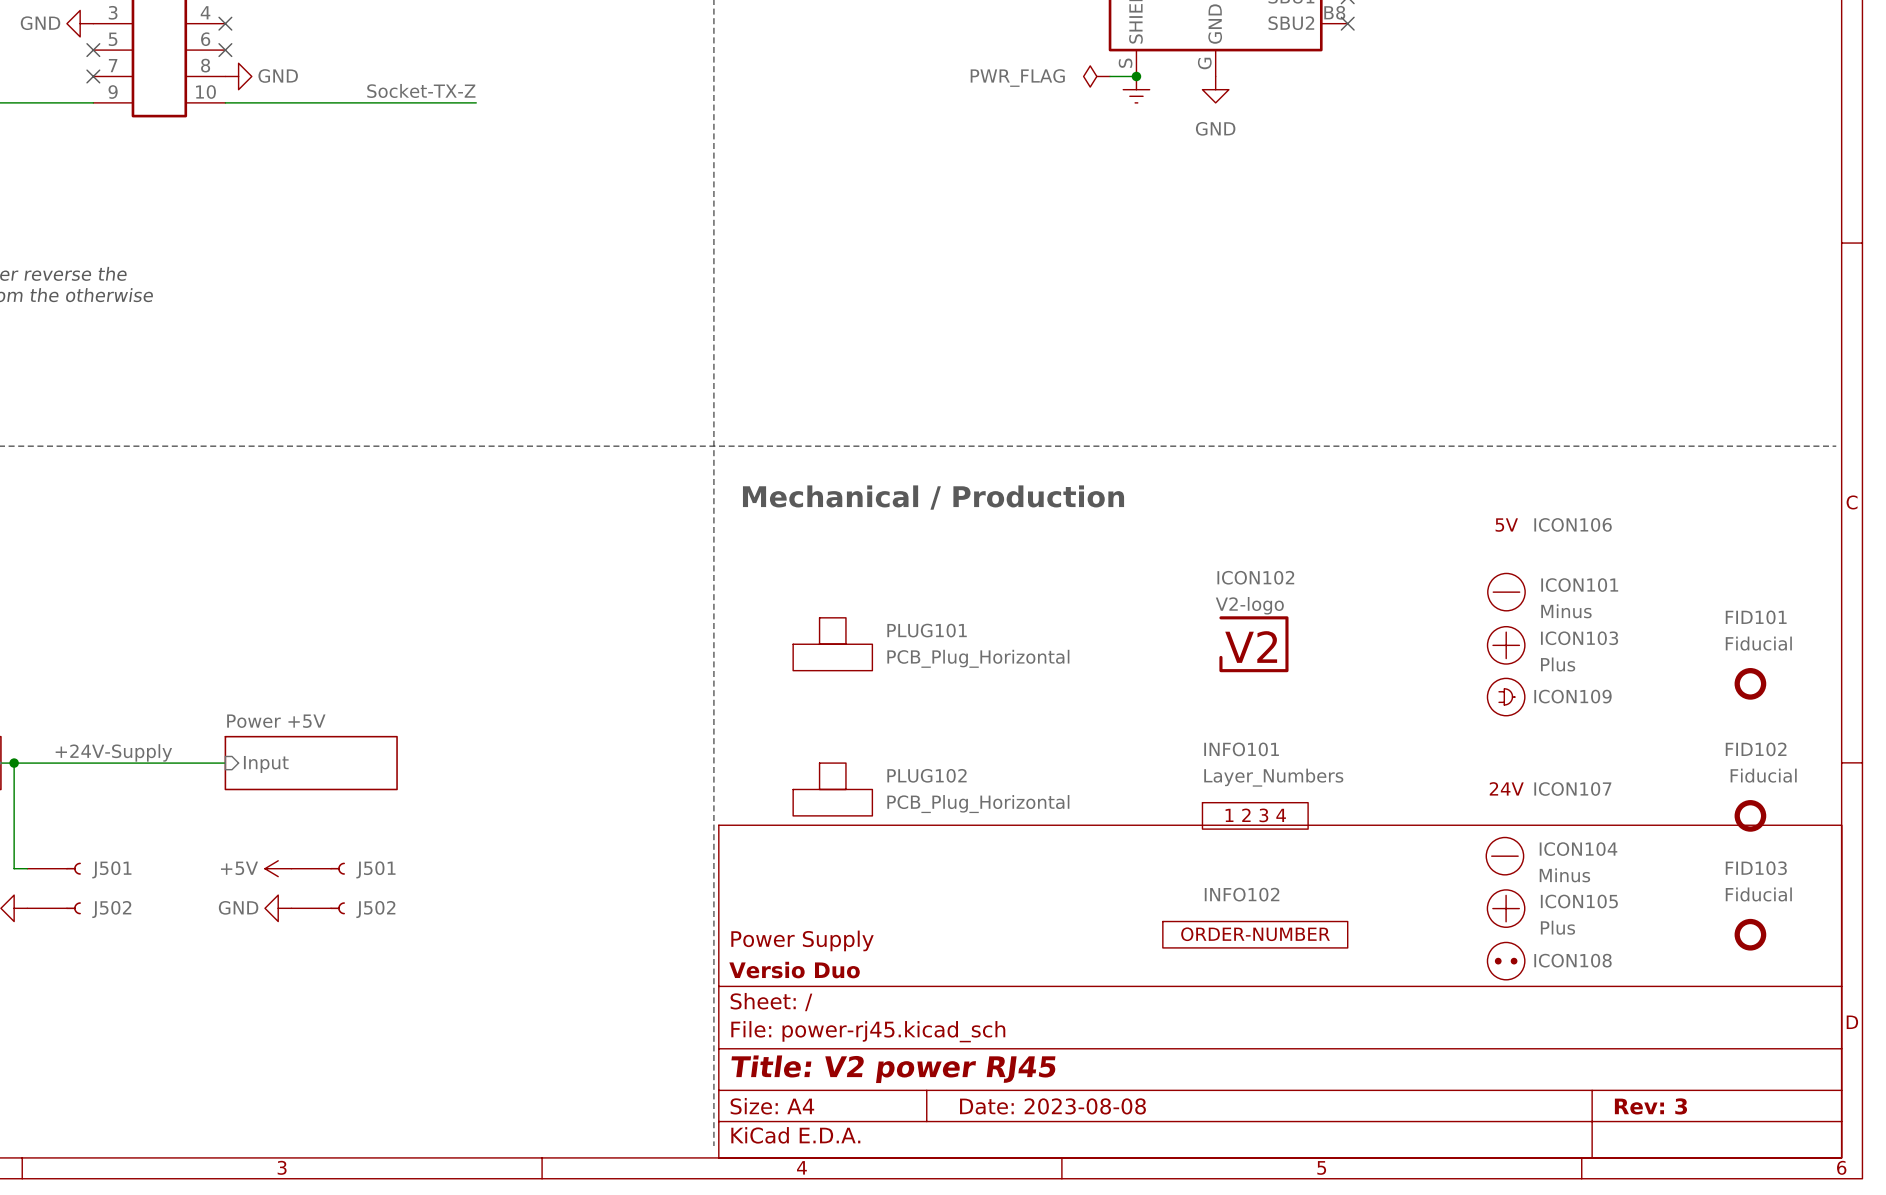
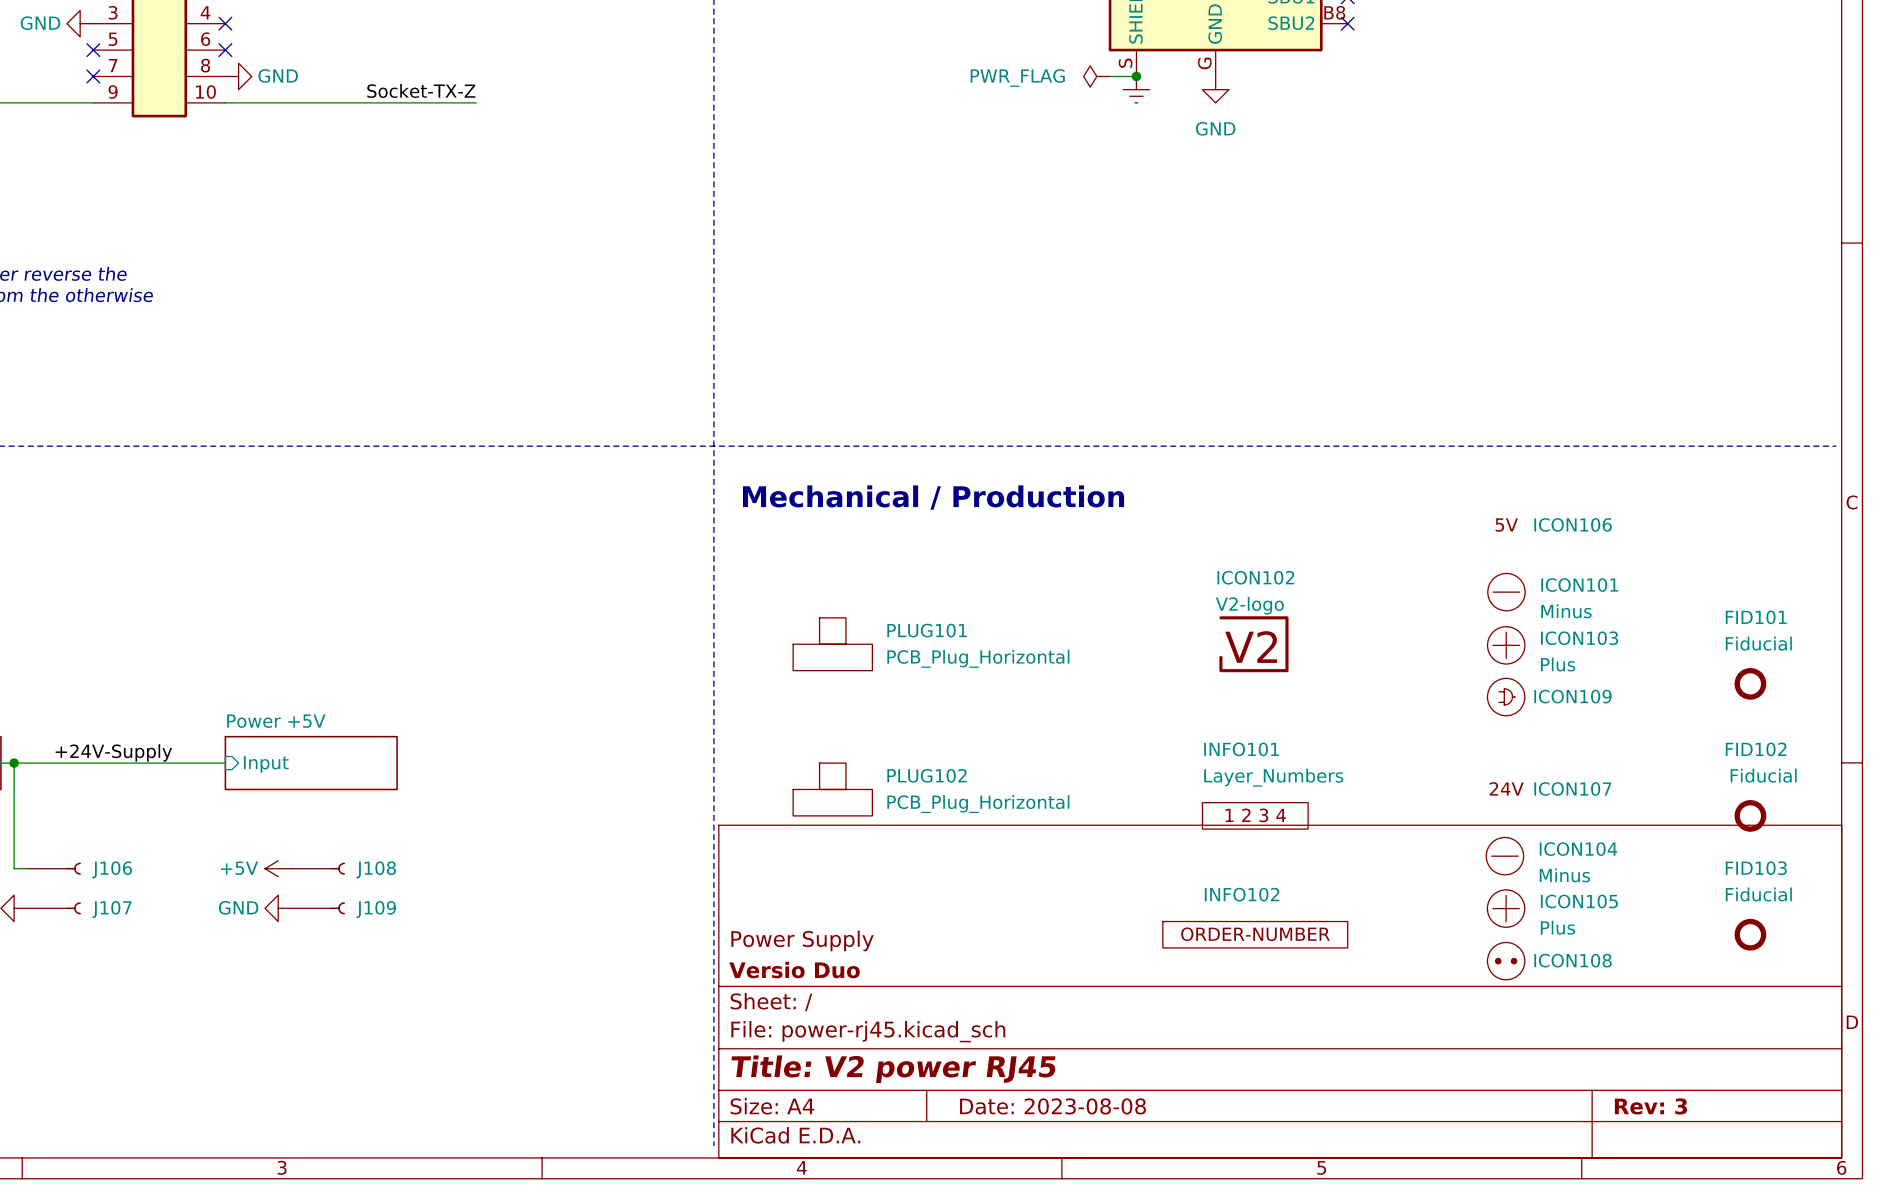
J501 name: J501 (111, 869) -> J106 (112, 869)
J501 name: J501 (375, 869) -> J108 (376, 869)
J502 name: J502 (111, 909) -> J107 (111, 909)
J502 name: J502 (375, 909) -> J109 (376, 909)

